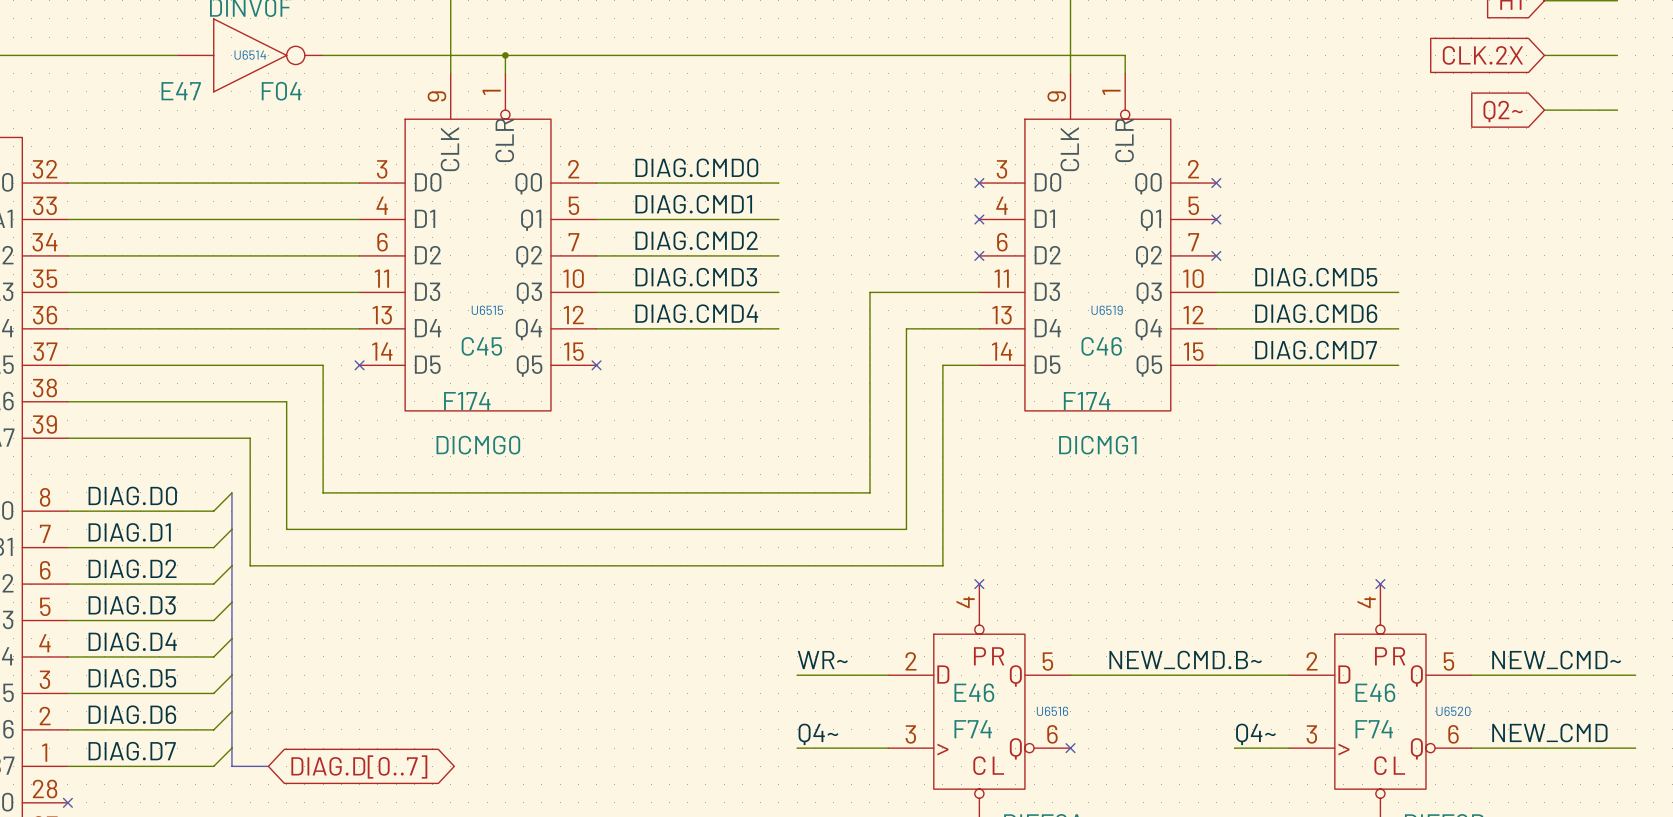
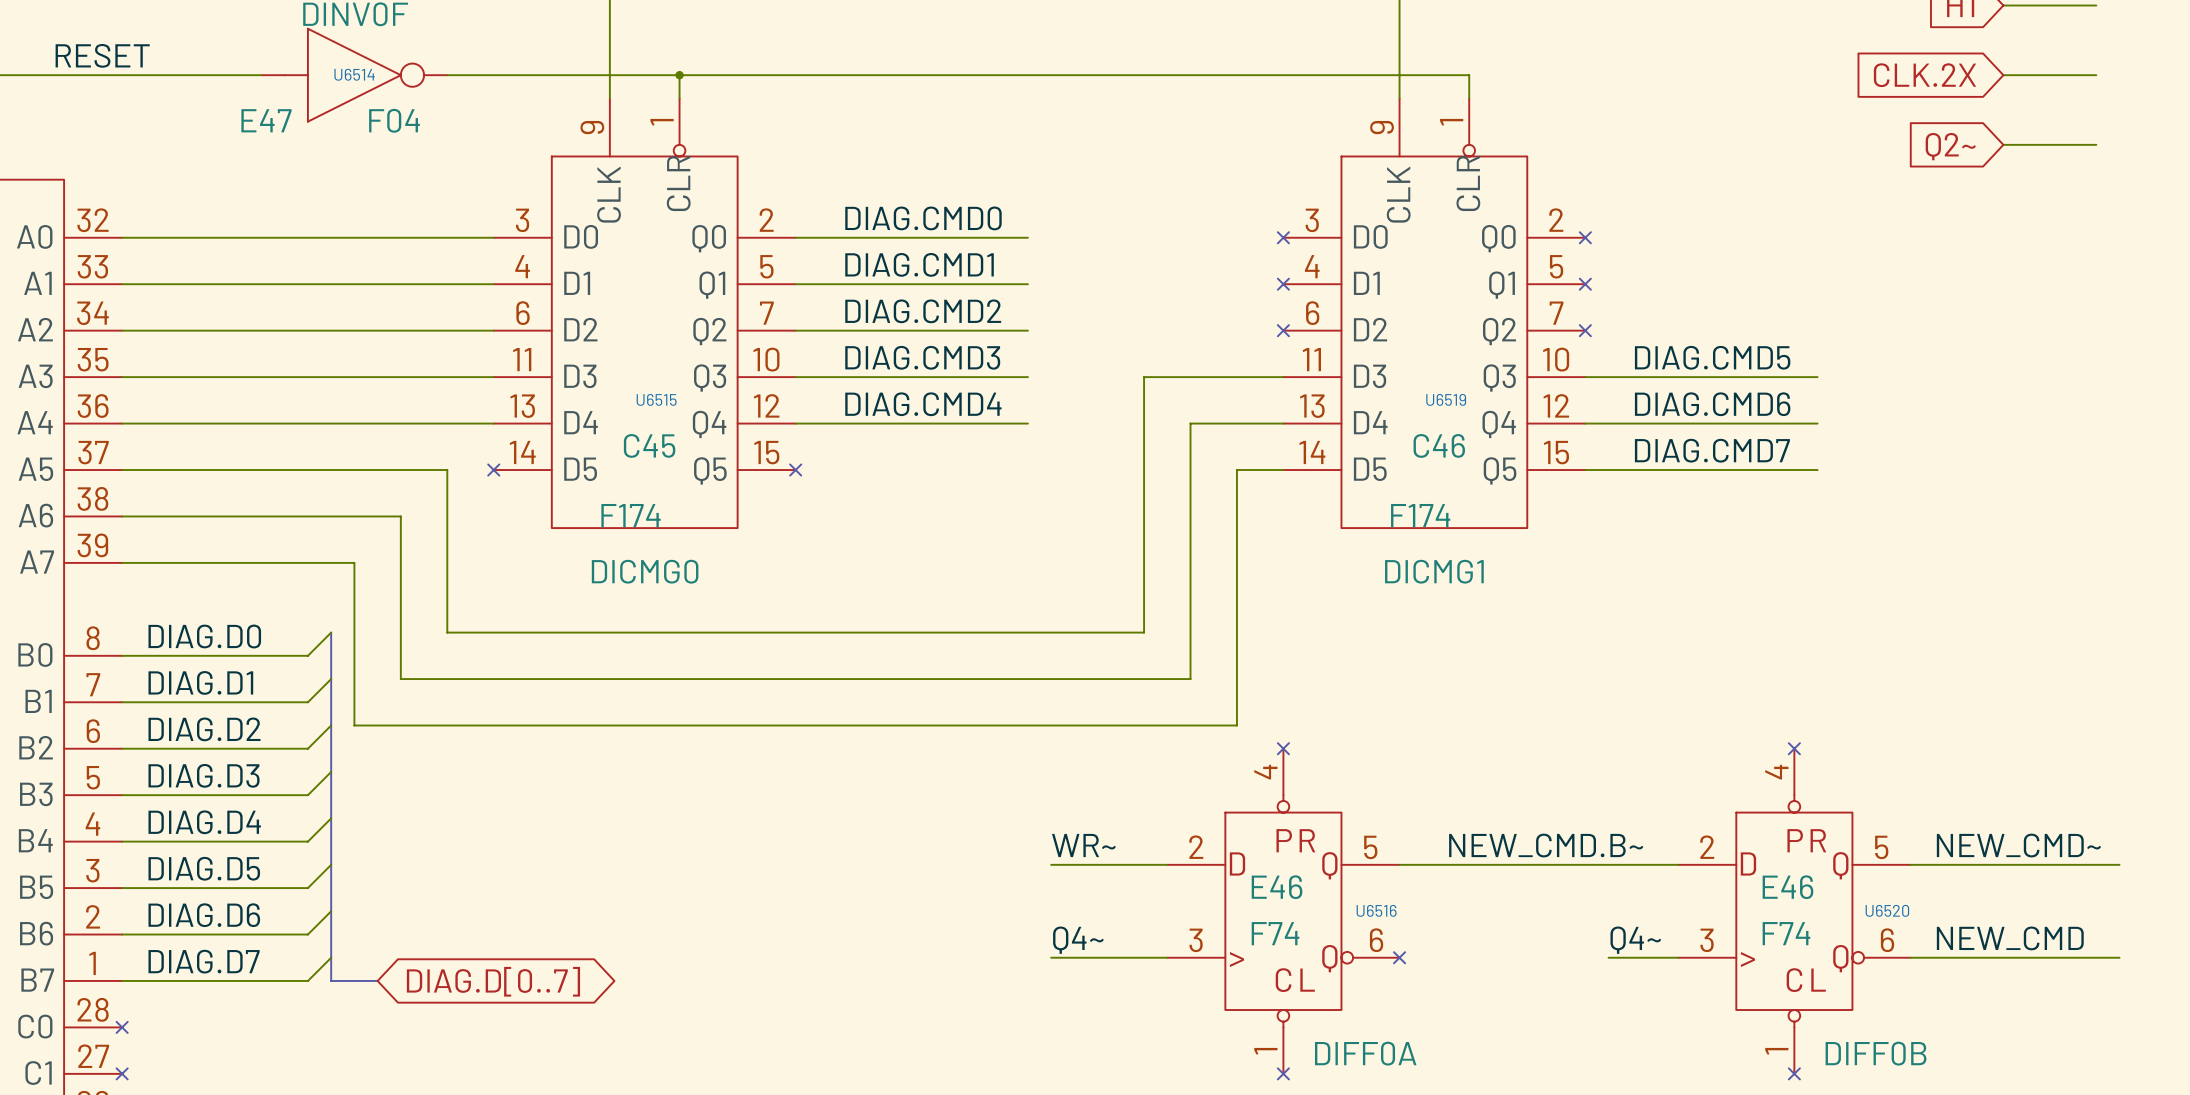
label: none -> RESET (102, 55)

